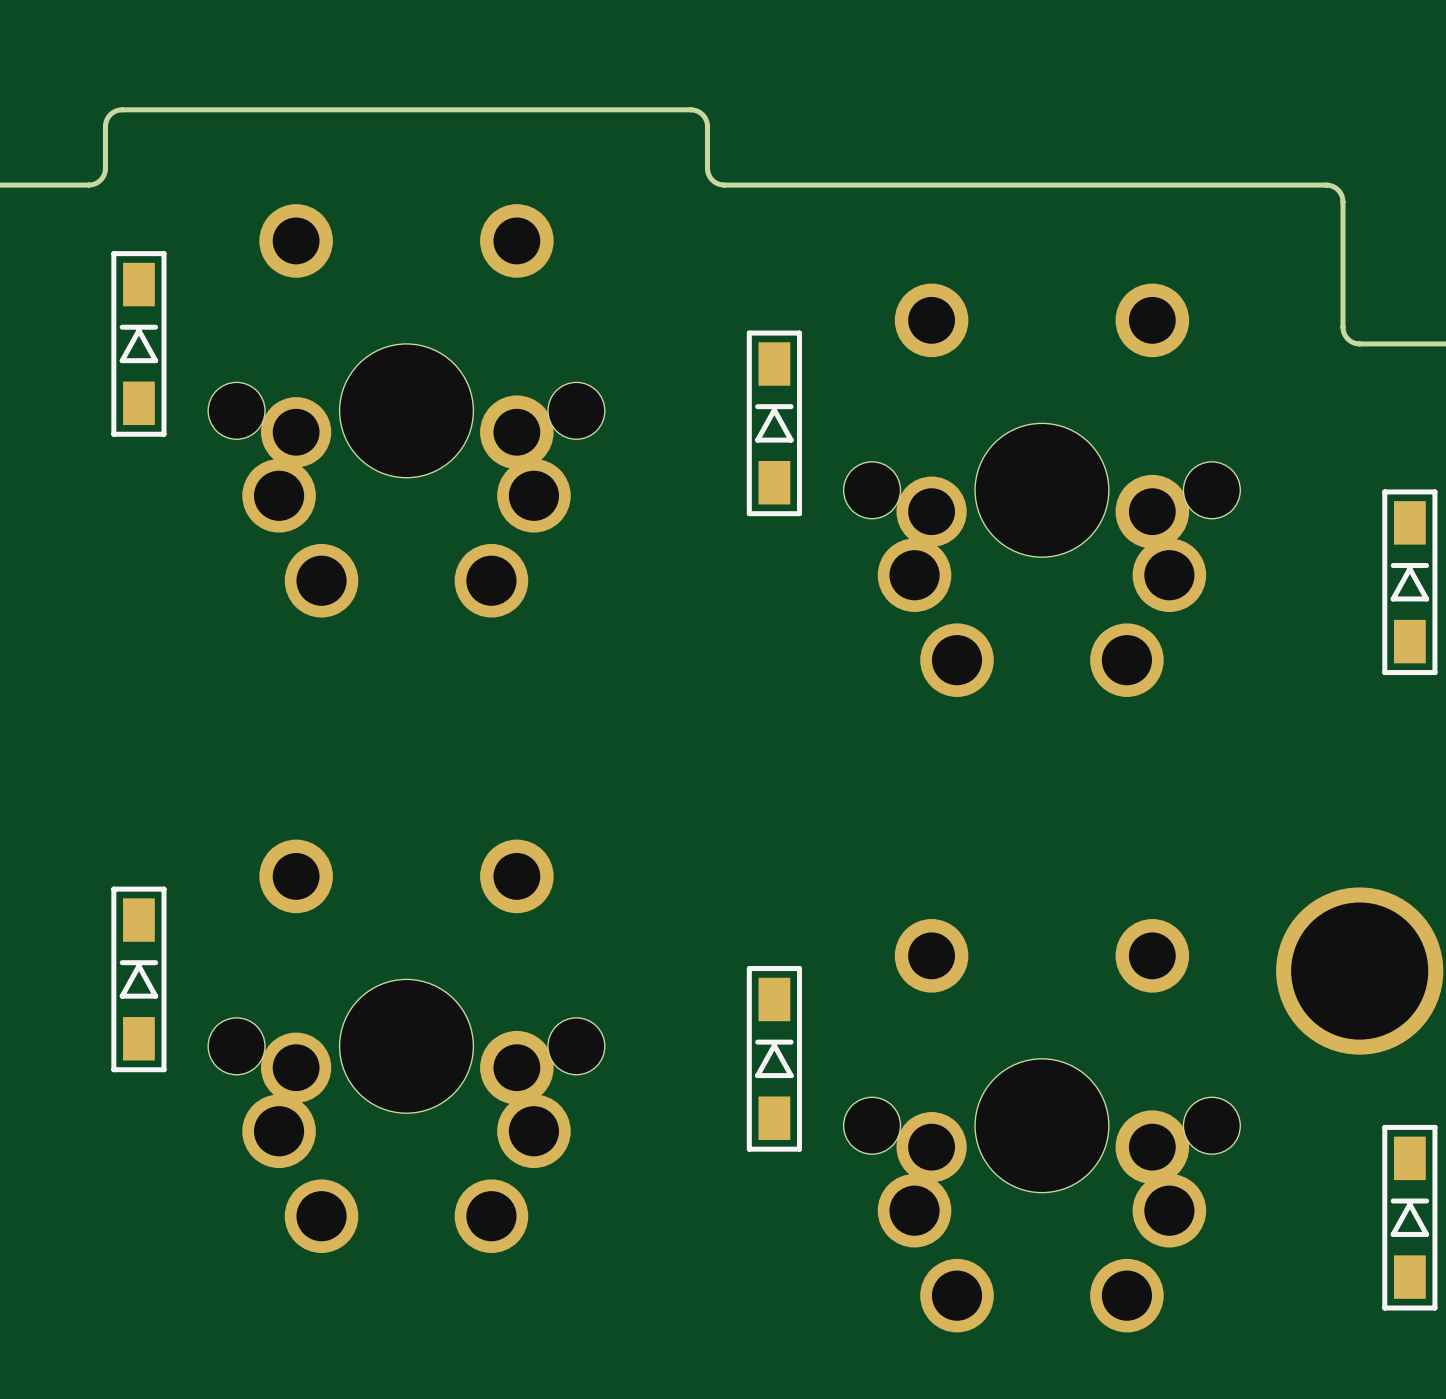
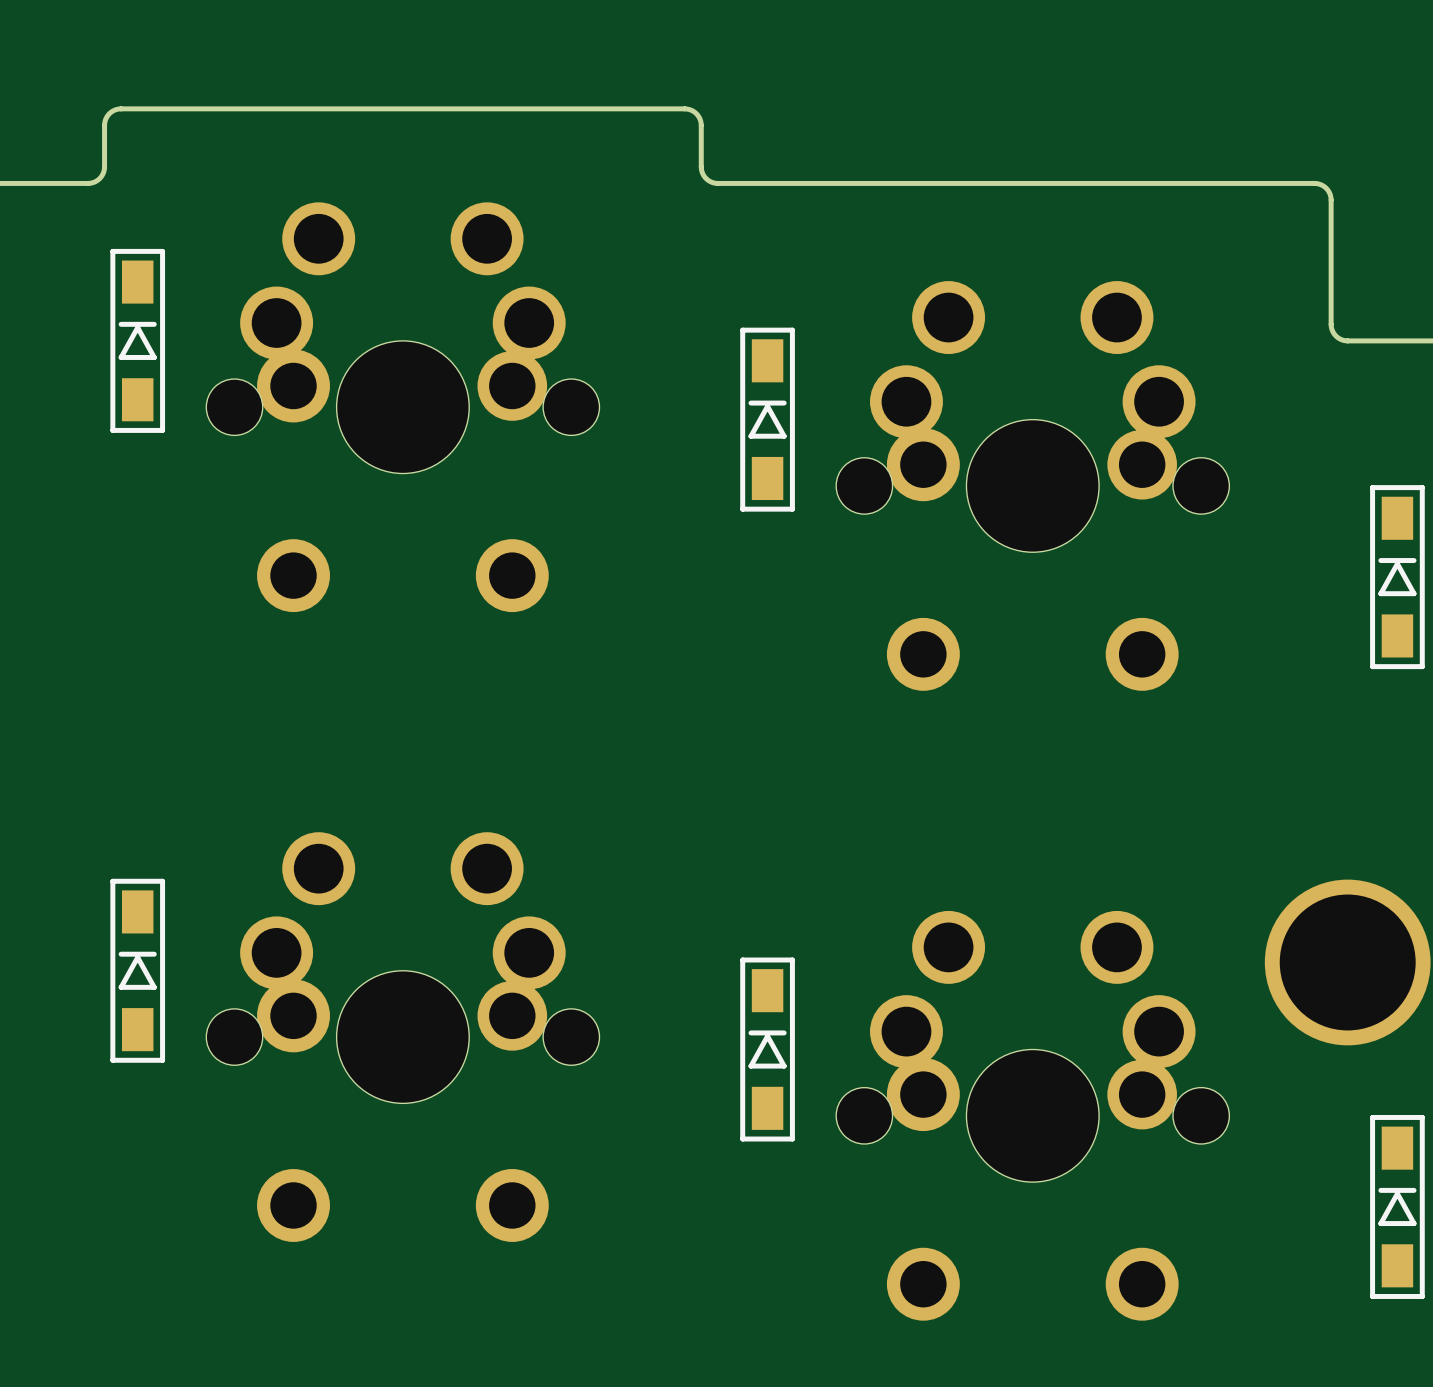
part rotation: 0° (406, 410) -> 180° (402, 407)
part rotation: 0° (1041, 490) -> 180° (1032, 485)
part rotation: 0° (406, 1046) -> 180° (402, 1037)
part rotation: 0° (1041, 1125) -> 180° (1032, 1115)

